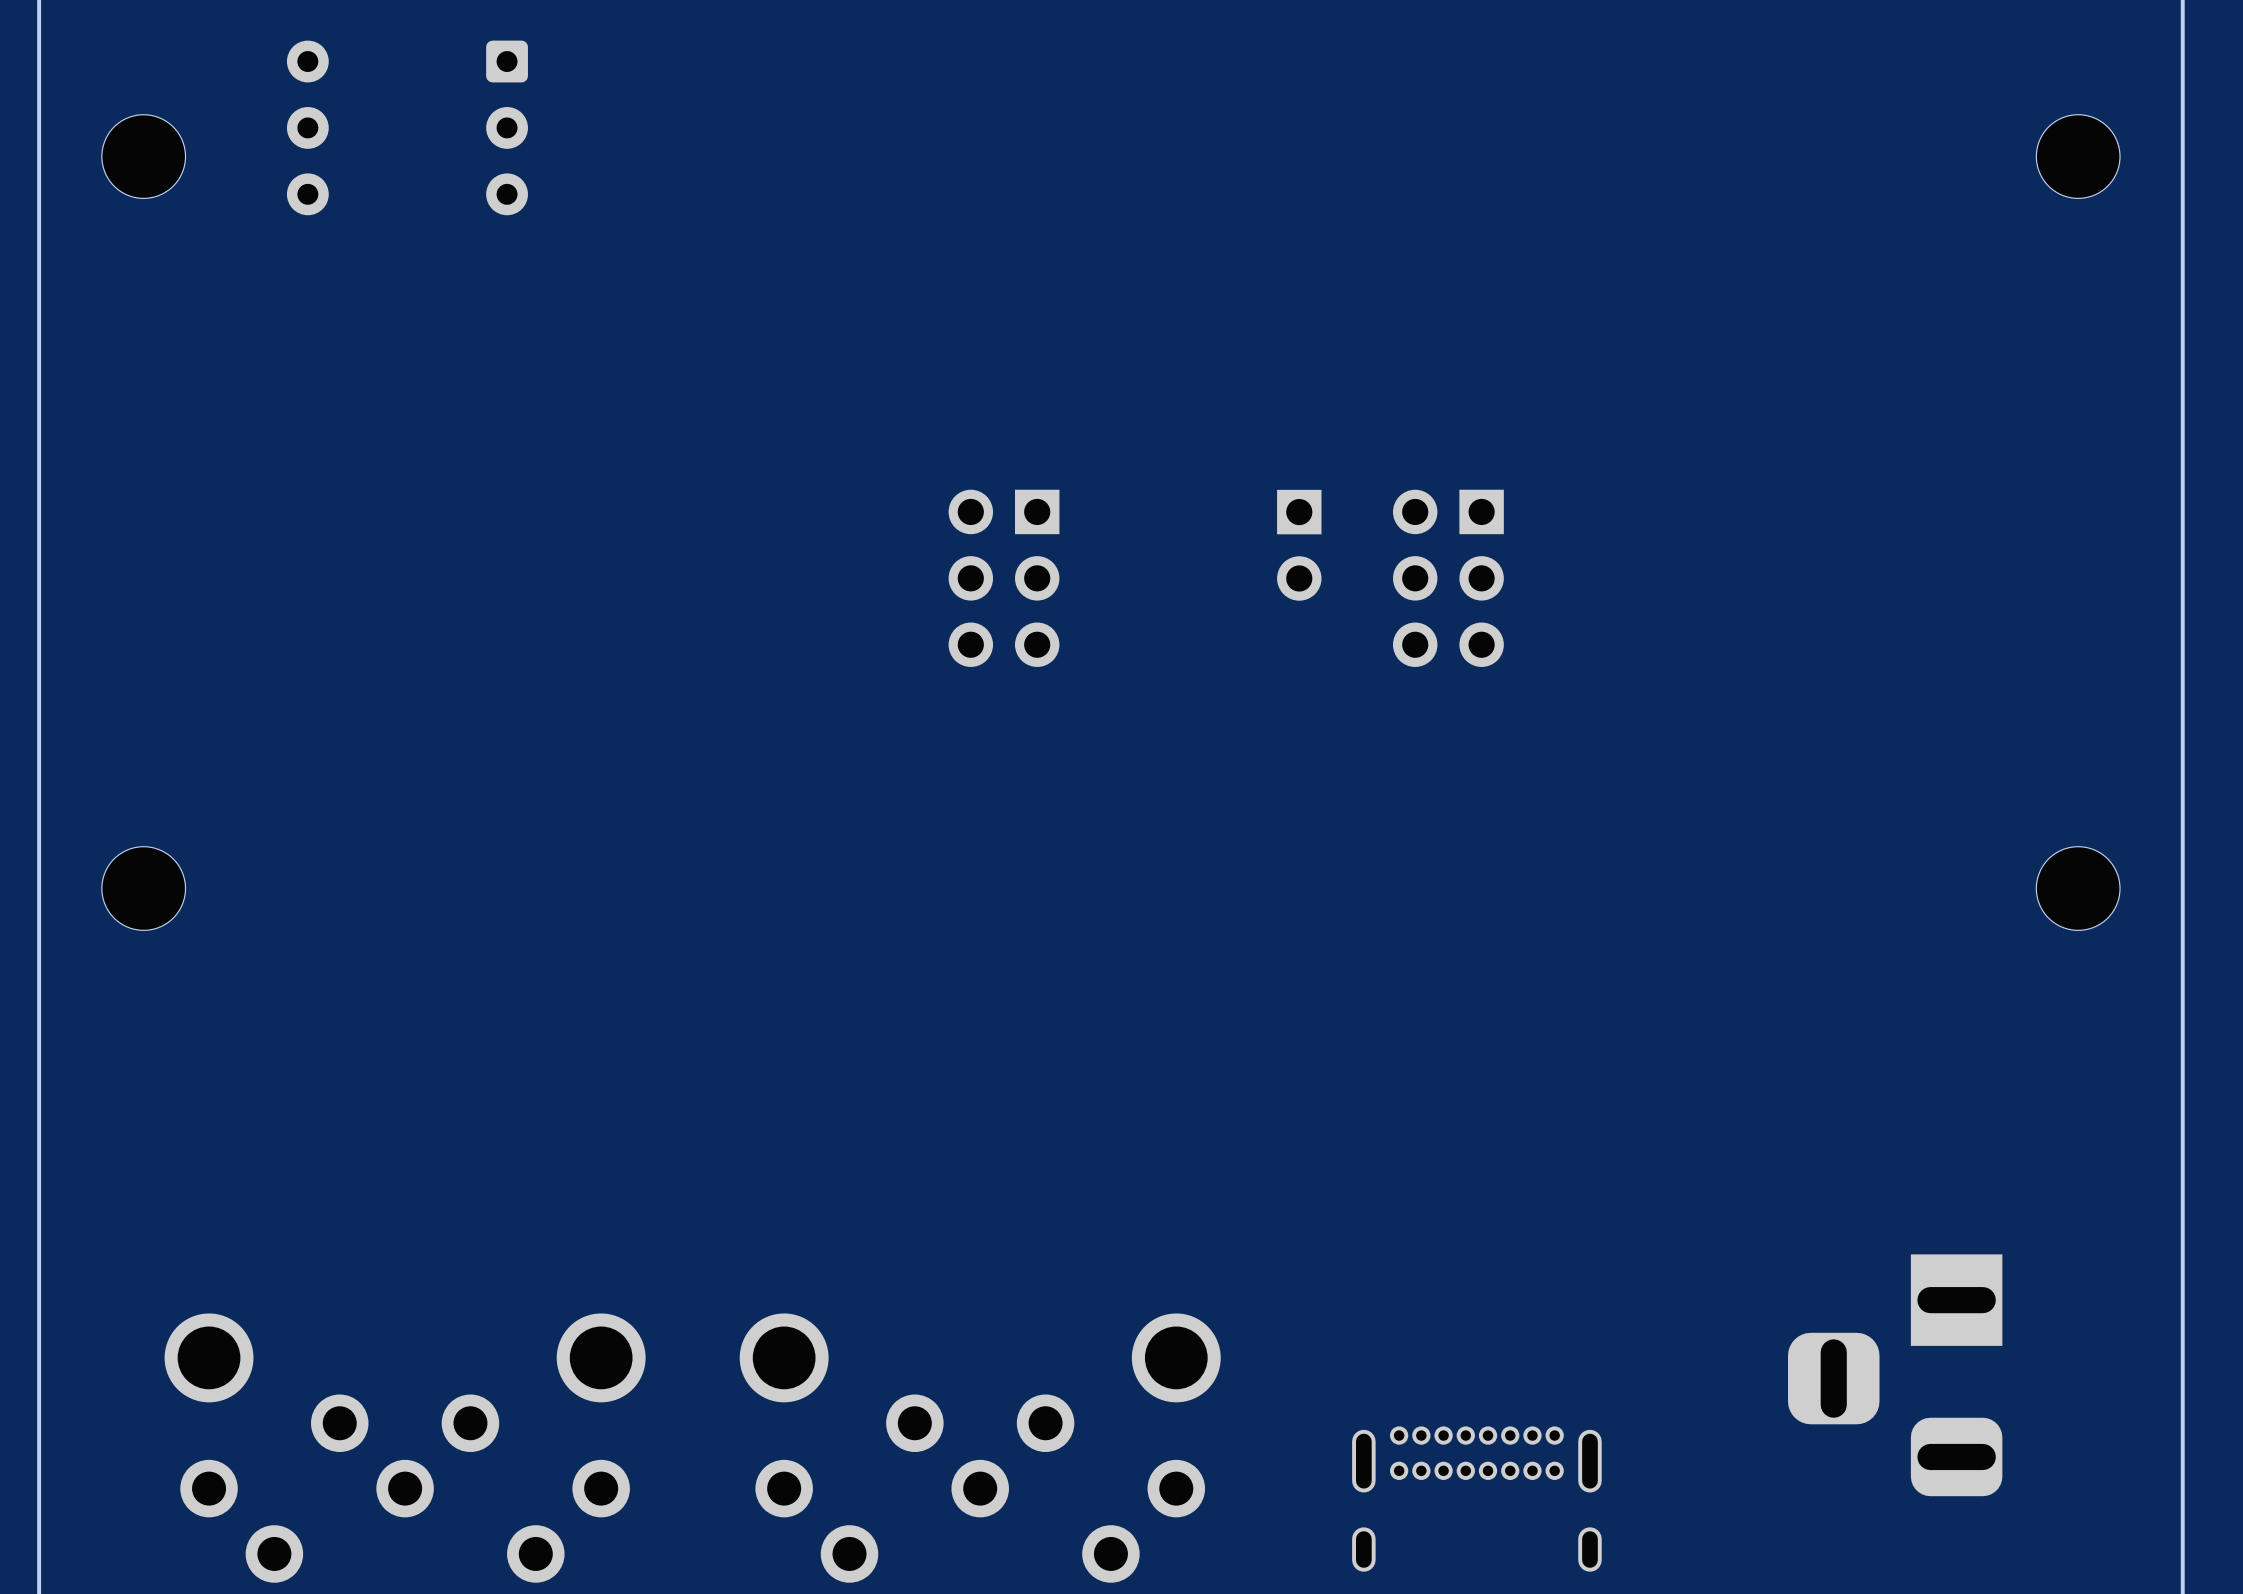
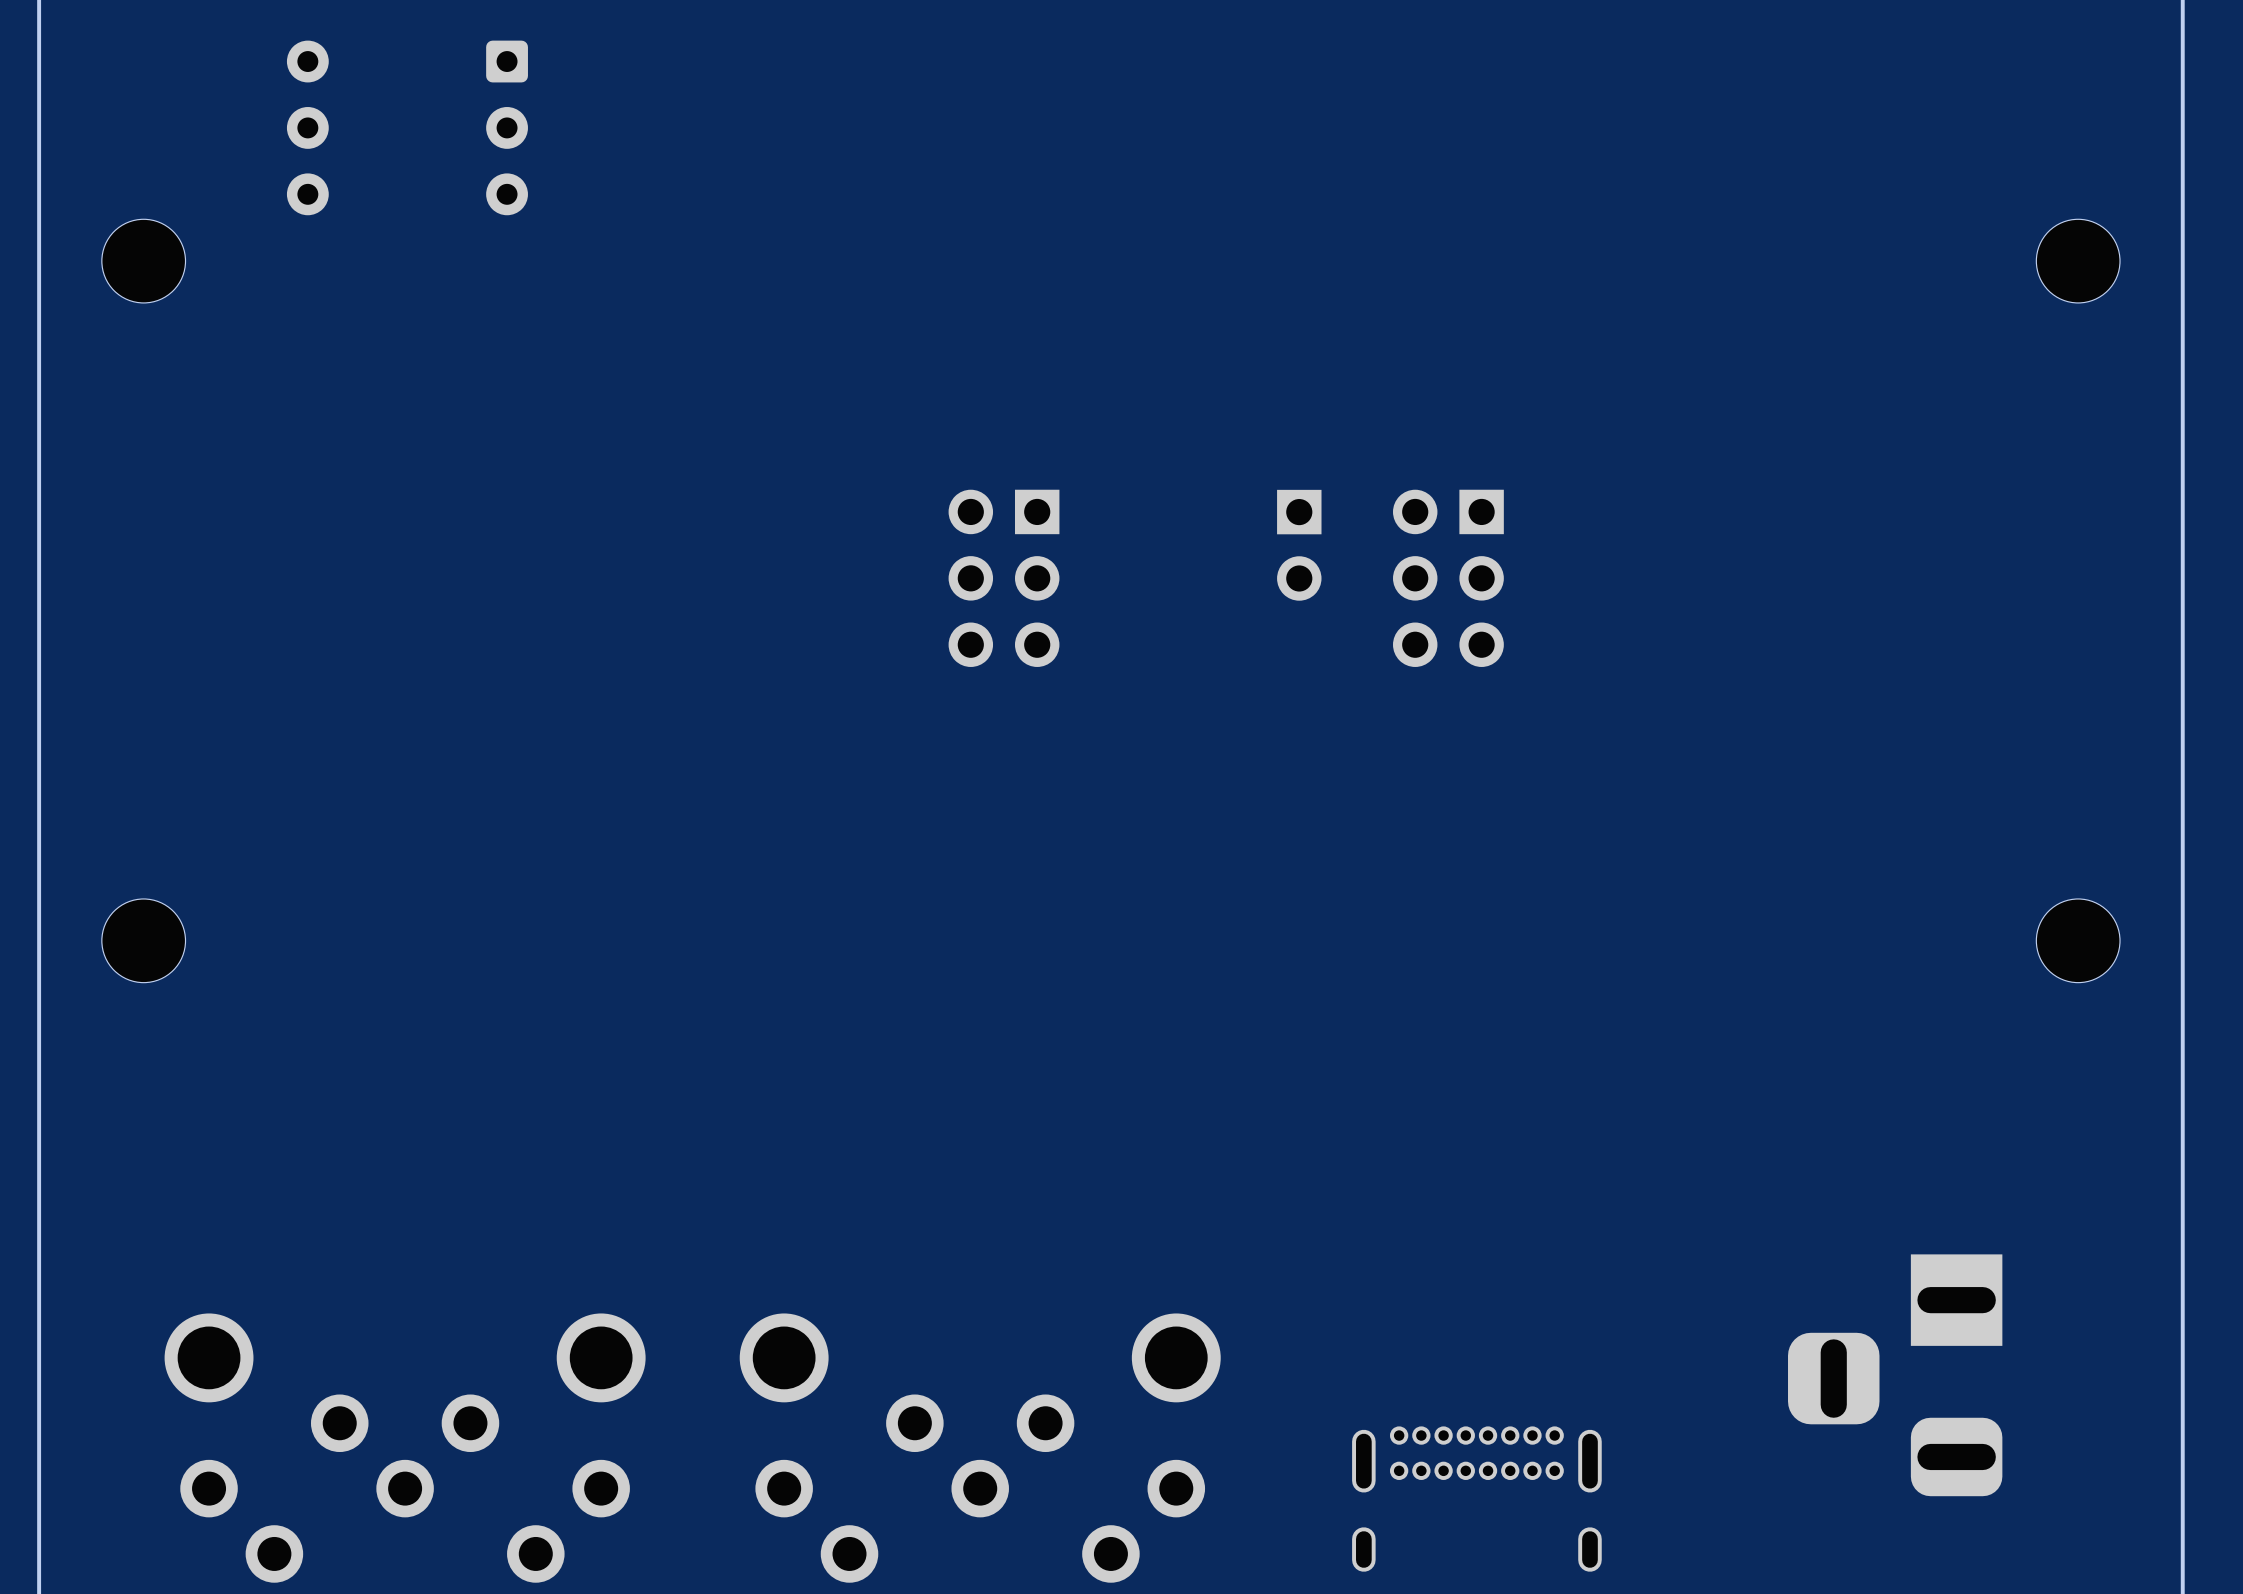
part position: (143, 156) -> (143, 261)
part position: (2078, 156) -> (2078, 261)
part position: (143, 888) -> (143, 940)
part position: (2078, 888) -> (2078, 940)

